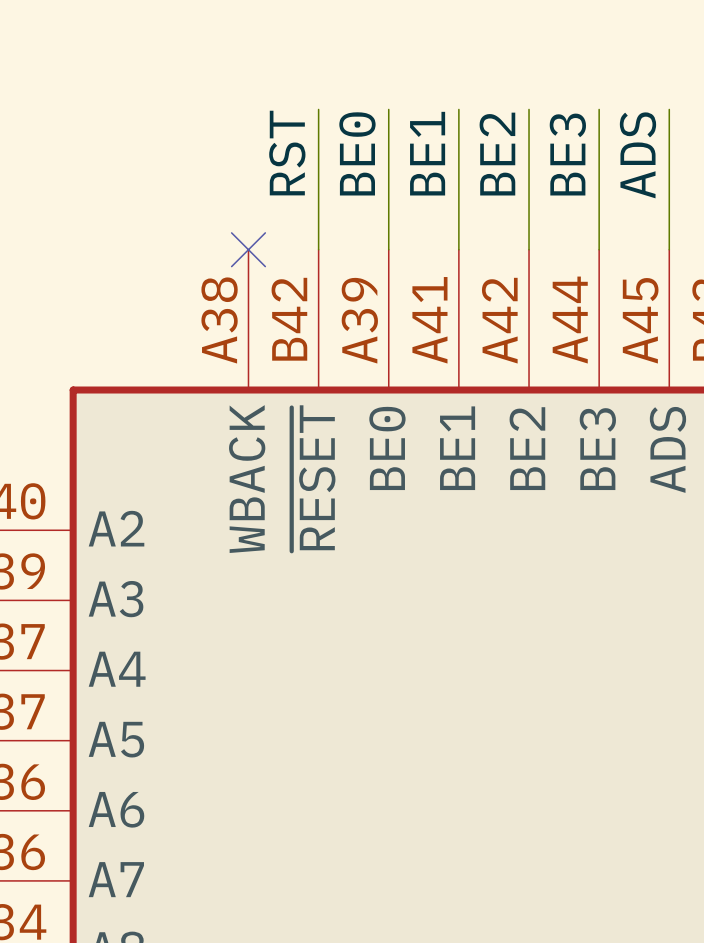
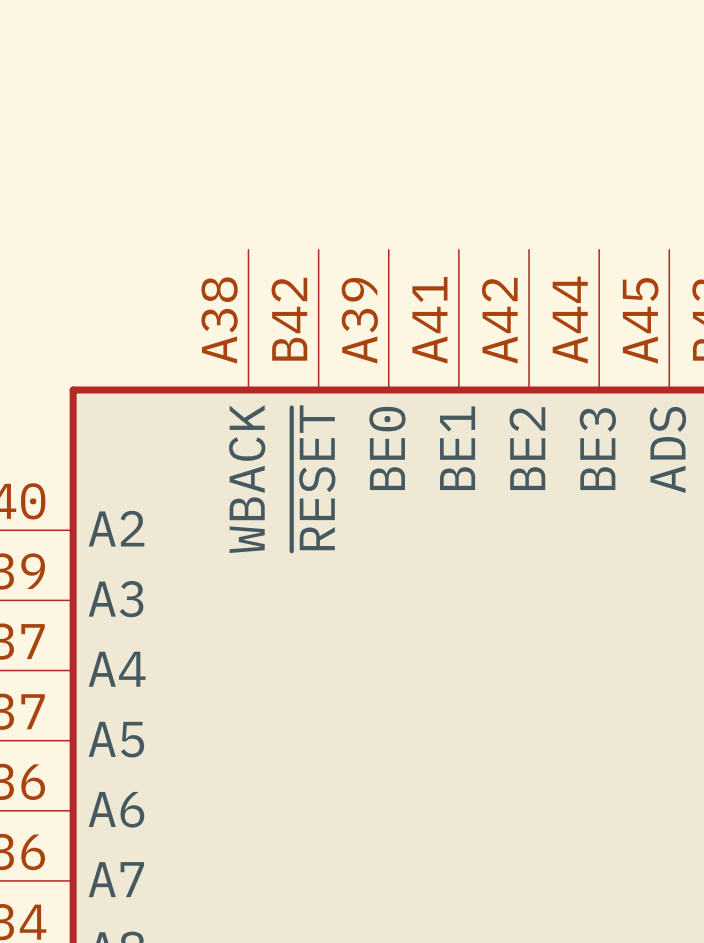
wire: (318, 109) (318, 249) -> none
wire: (388, 109) (388, 249) -> none
wire: (458, 109) (458, 249) -> none
wire: (529, 109) (529, 249) -> none
wire: (599, 109) (599, 249) -> none
wire: (669, 109) (669, 249) -> none
label: RST (287, 153) -> none
label: BE0 (357, 153) -> none
label: BE1 (427, 153) -> none
label: BE2 (497, 154) -> none
label: BE3 (567, 154) -> none
label: ADS (637, 155) -> none
no-connect mark: (248, 249) -> none

